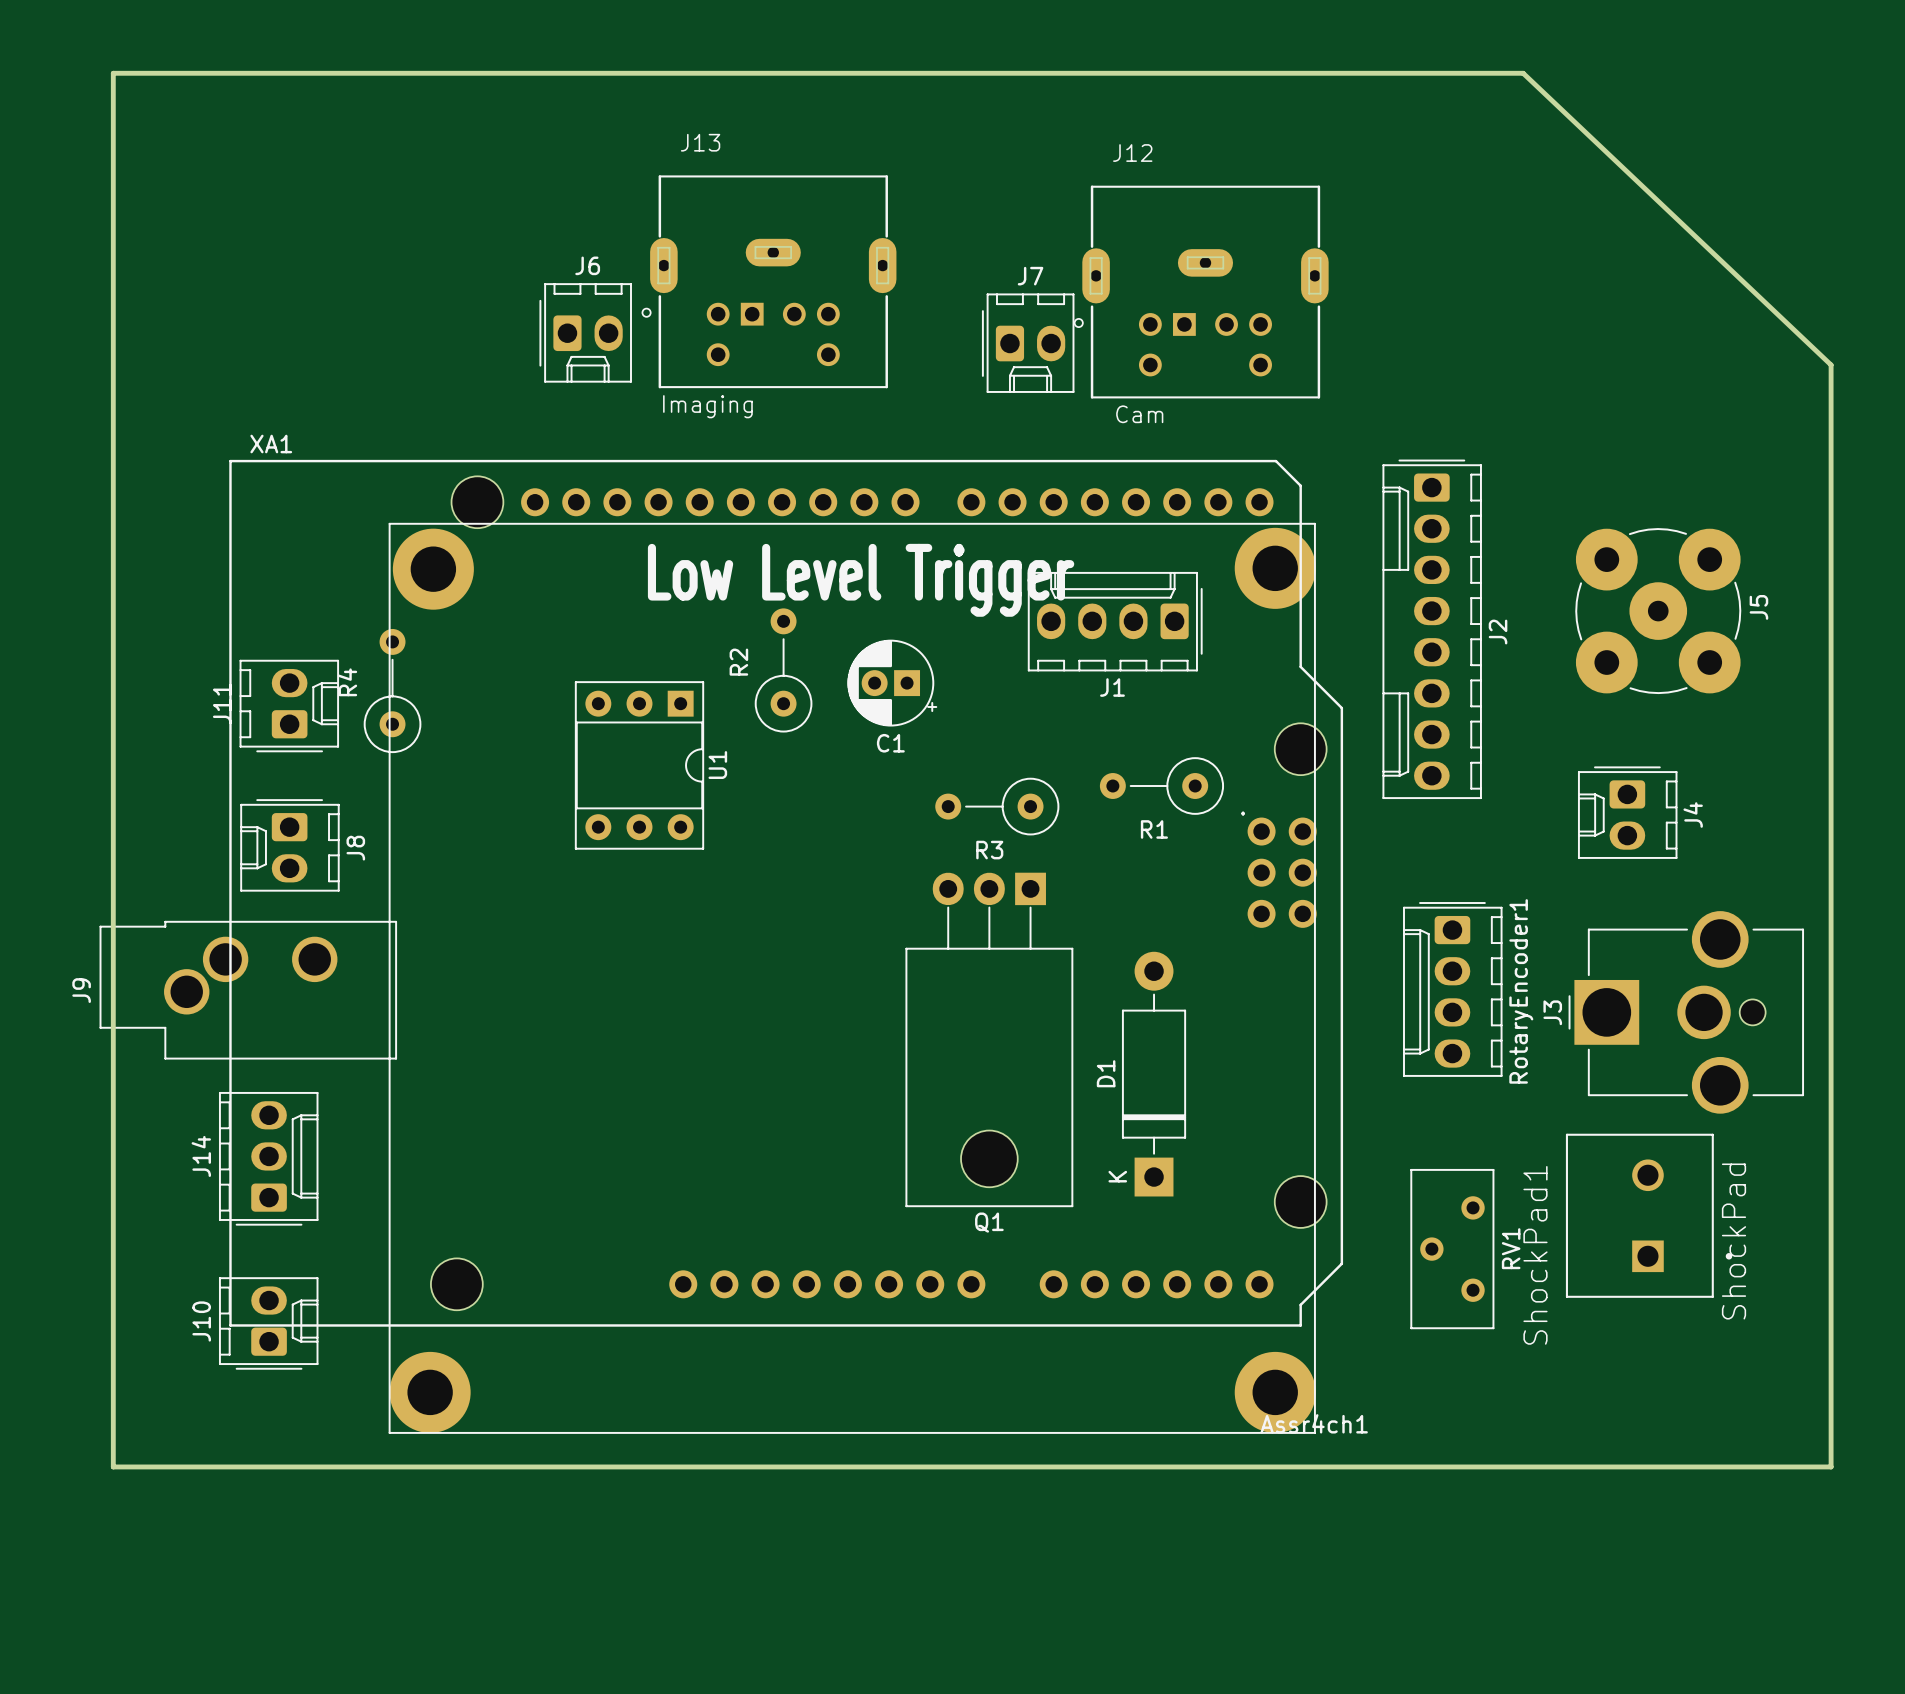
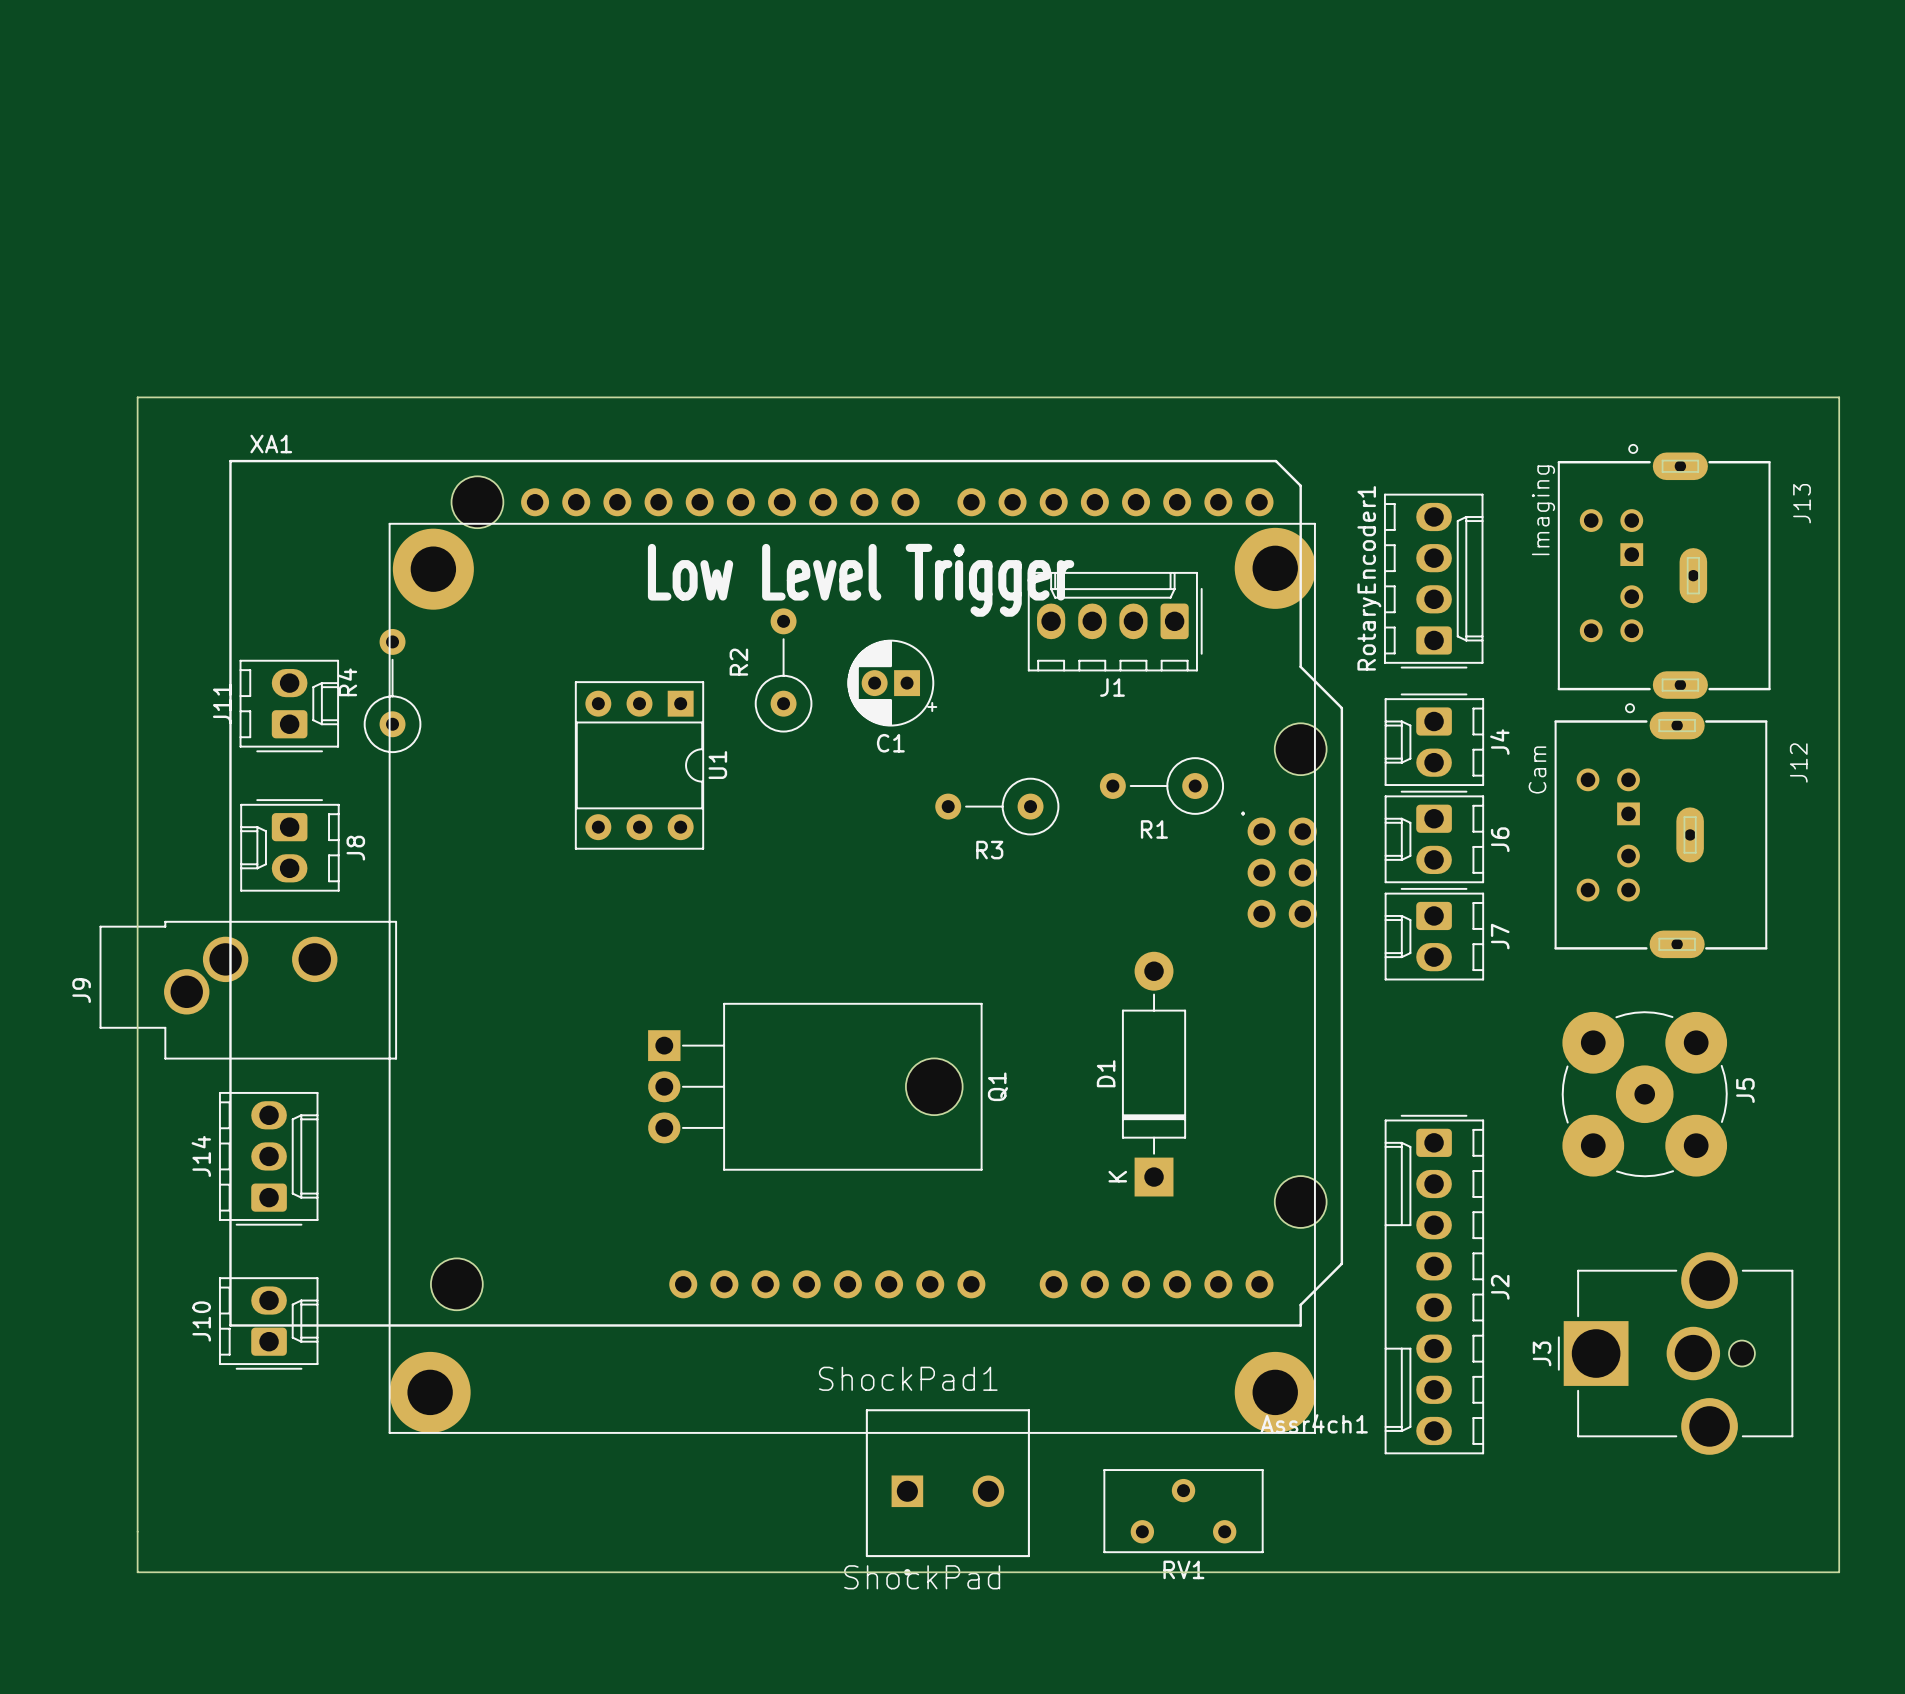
board edge: (113, 73) (113, 1466) (1831, 1466) (1831, 364) (1523, 73) (113, 73) -> (137, 397) (137, 1572) (1839, 1572) (1839, 397) (137, 397)
J13 rotation: 0° (769, 281) -> 90° clockwise (1664, 571)
J13 position: (769, 281) -> (1664, 571)
J12 rotation: 0° (1201, 292) -> 90° clockwise (1660, 830)
J12 position: (1201, 292) -> (1660, 830)
J6 rotation: 0° (585, 332) -> 90° clockwise (1434, 836)
J6 position: (585, 332) -> (1434, 836)
J7 rotation: 0° (1028, 343) -> 90° clockwise (1434, 934)
J7 position: (1028, 343) -> (1434, 934)
J5 position: (1658, 611) -> (1644, 1094)
J2 position: (1432, 629) -> (1434, 1284)
J4 position: (1627, 812) -> (1434, 739)
RotaryEncoder1 rotation: 0° (1452, 989) -> 180° (1433, 581)
RotaryEncoder1 position: (1452, 989) -> (1433, 581)
J3 position: (1686, 1012) -> (1675, 1353)
Q1 rotation: 0° (989, 1039) -> 90° counterclockwise (815, 1086)
ShockPad1 rotation: 0° (1649, 1215) -> 90° clockwise (947, 1492)
ShockPad1 position: (1649, 1215) -> (947, 1492)
RV1 rotation: 0° (1452, 1249) -> 90° clockwise (1183, 1511)
RV1 position: (1452, 1249) -> (1183, 1511)

